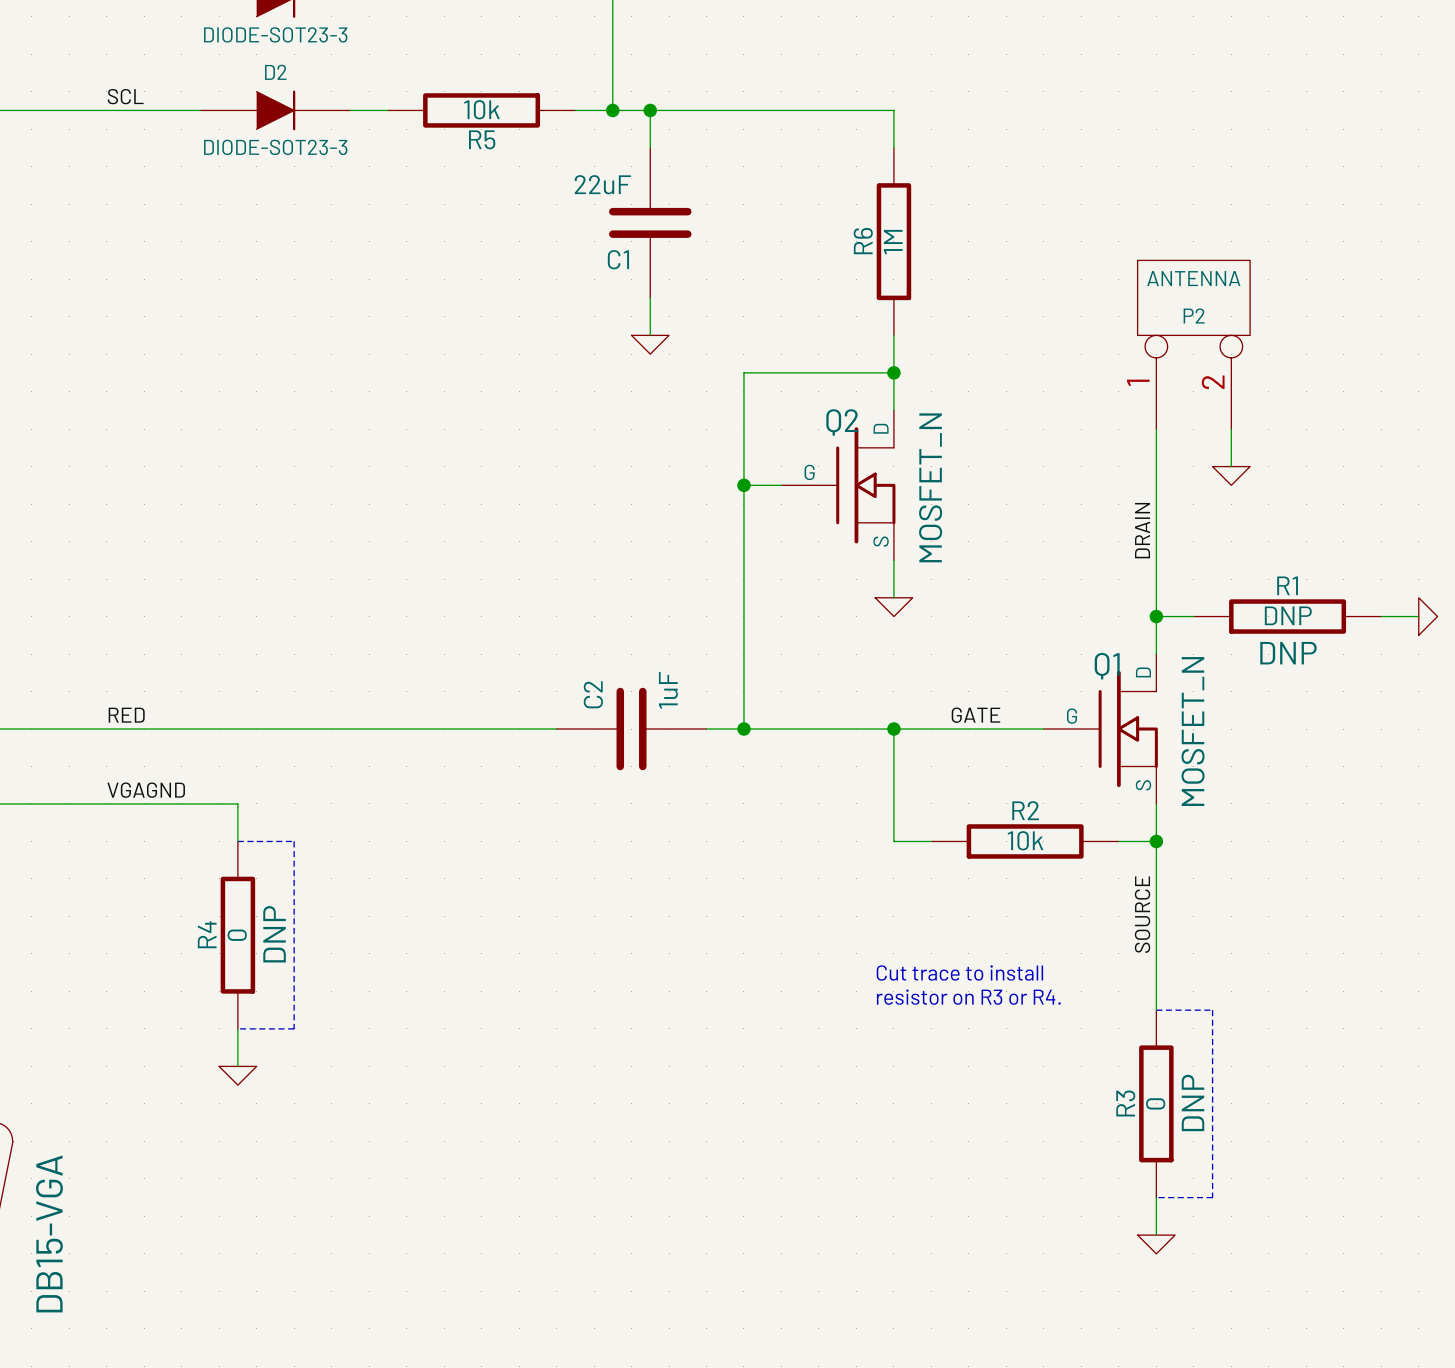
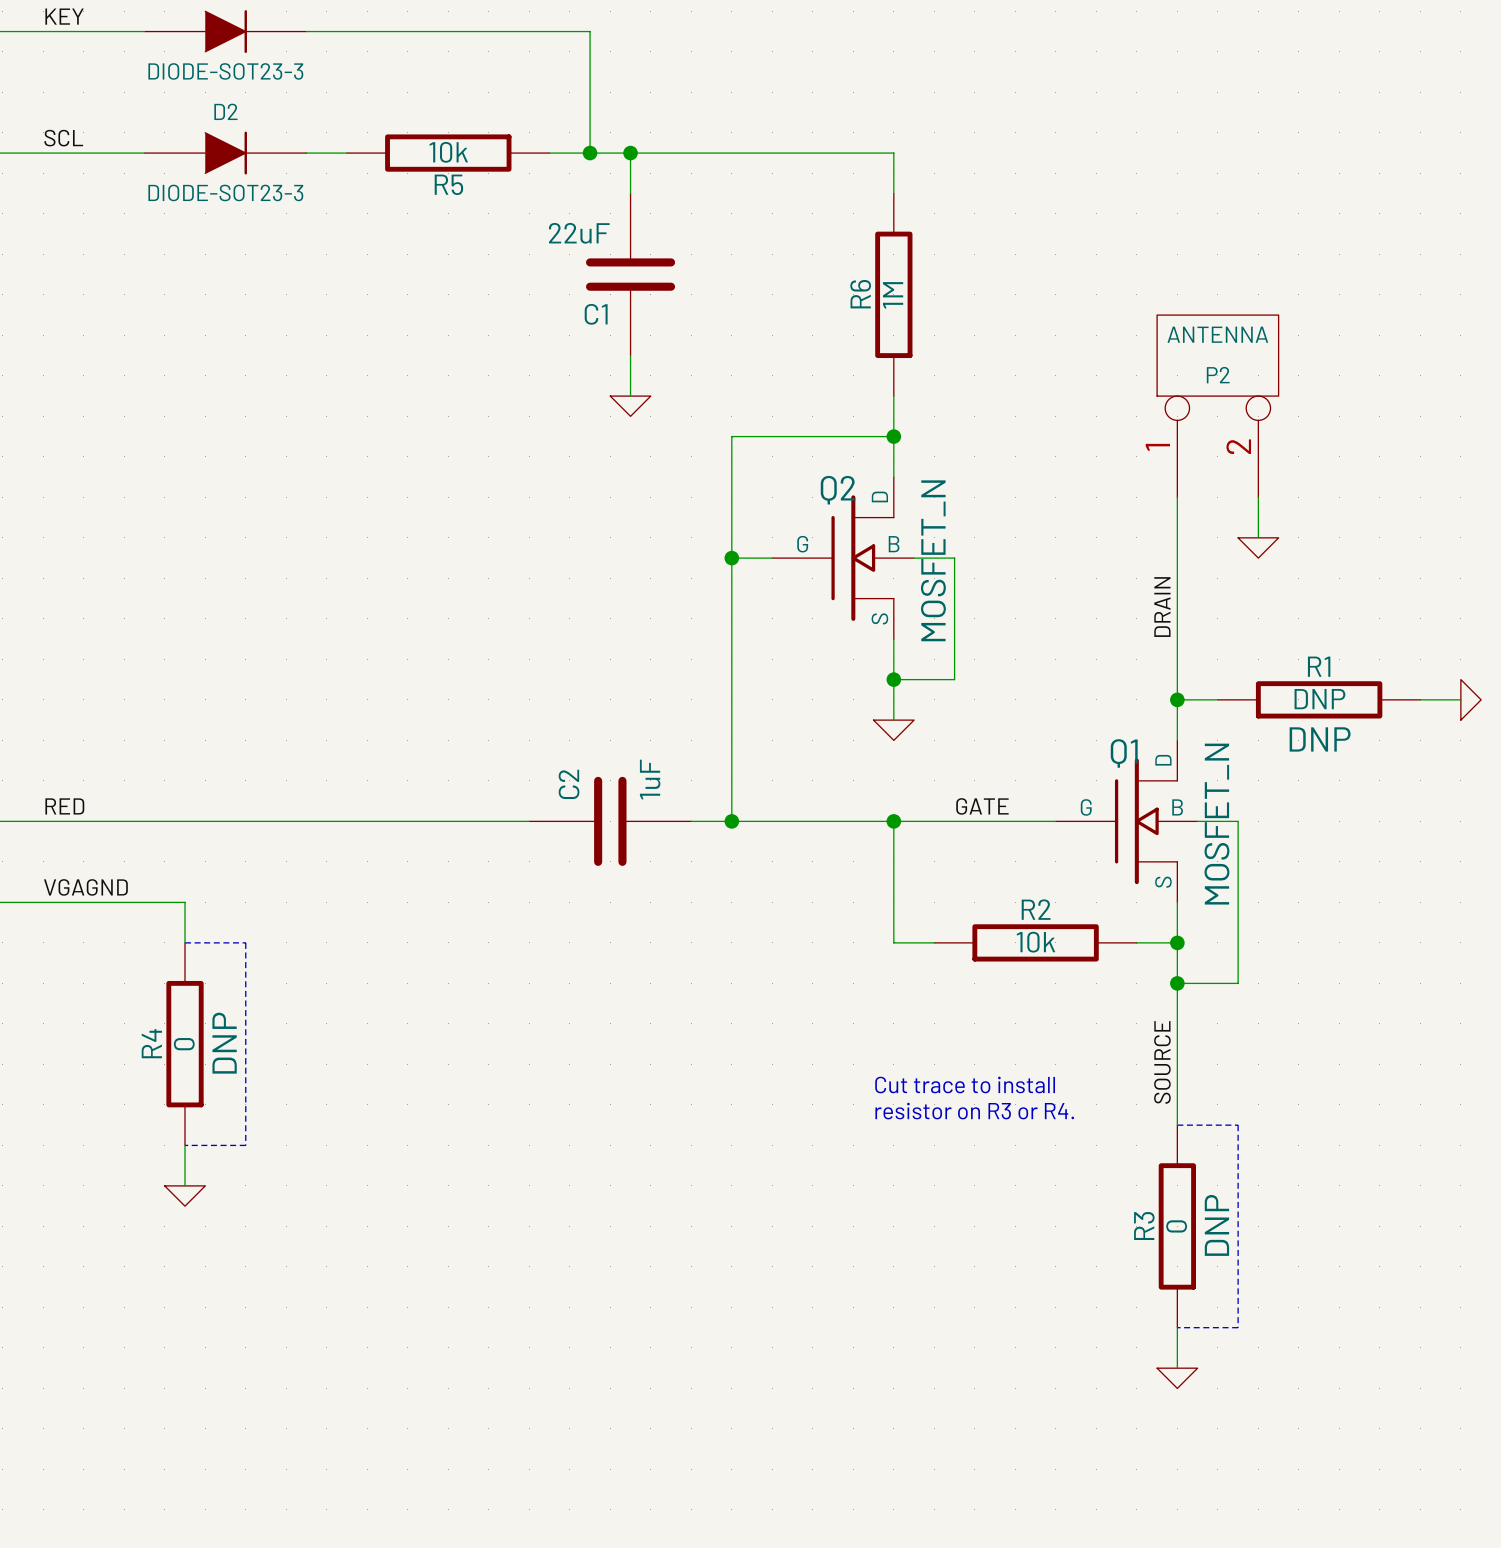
Q2 symbol: [781, 410, 896, 561] -> [772, 477, 915, 640]
wire: none -> (914, 558) (954, 558) (954, 679) (893, 679) (893, 720)
junction: none -> (893, 679)
power symbol position: (893, 607) -> (893, 730)
Q1 symbol: [1043, 654, 1158, 804] -> [1055, 740, 1198, 903]
wire: none -> (1197, 821) (1238, 821) (1238, 983) (1177, 983)
junction: none -> (1177, 983)
label position: SOURCE (1142, 914) -> SOURCE (1162, 1062)

